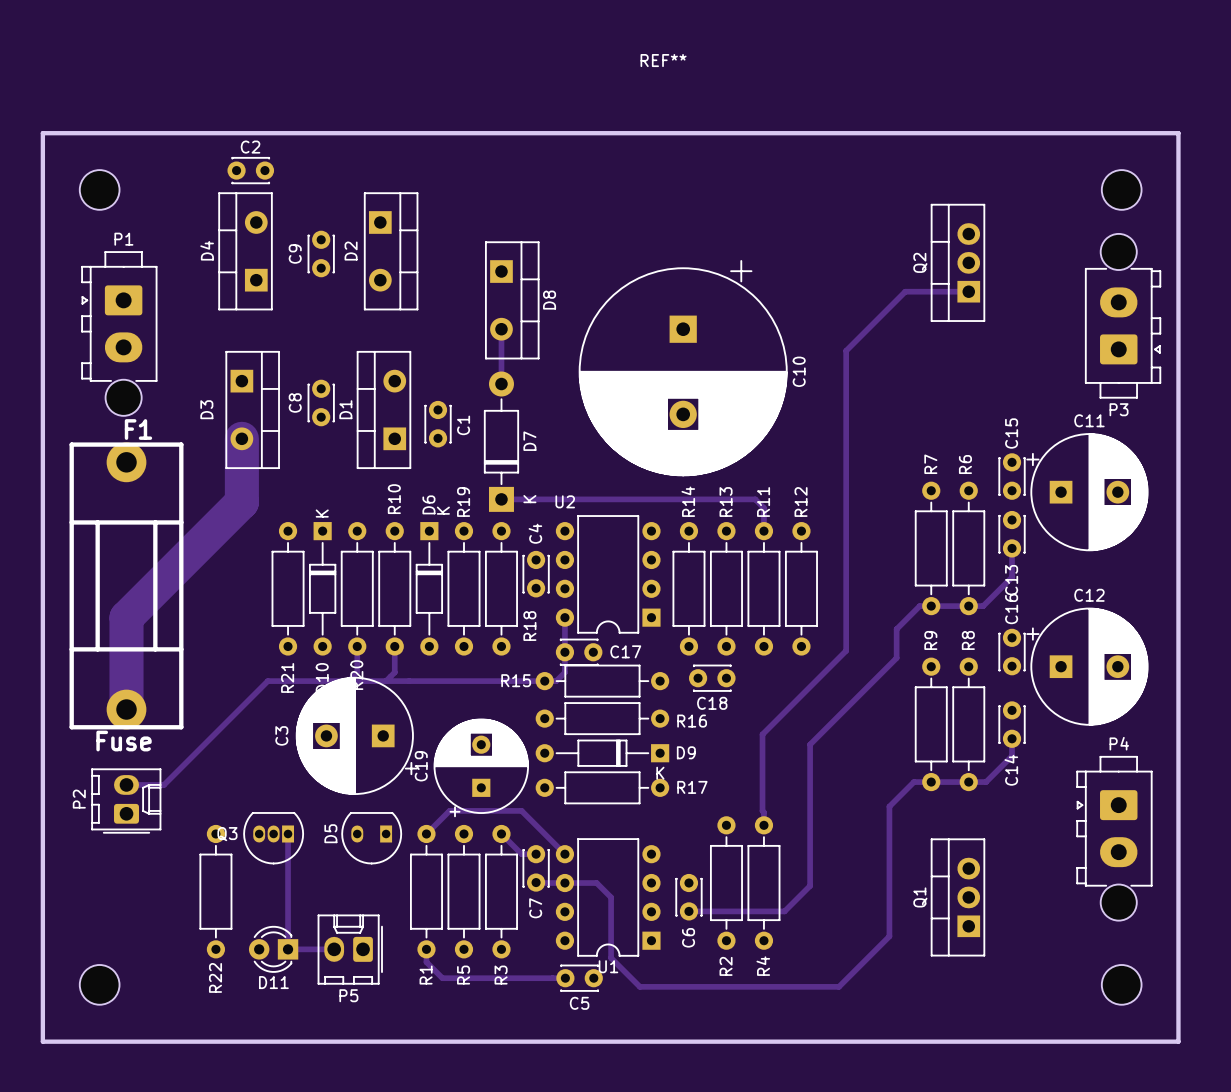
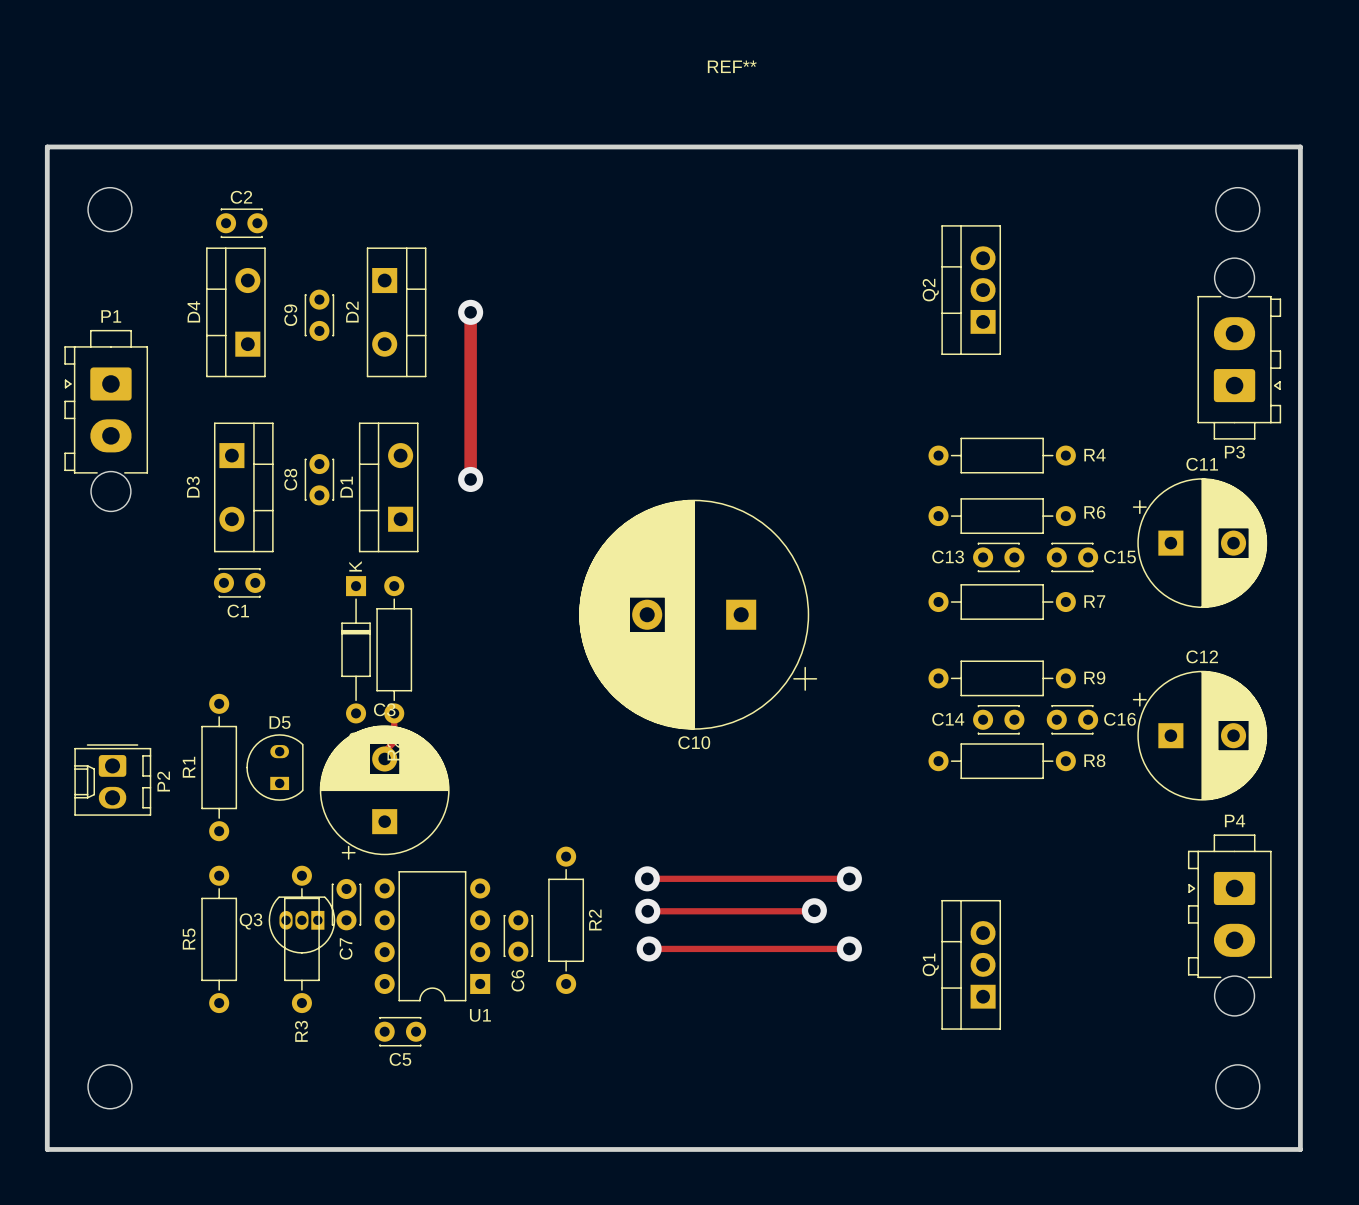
C2 position: (250, 170) -> (241, 223)
D4 position: (245, 251) -> (235, 312)
D2 position: (391, 251) -> (396, 312)
C9 position: (321, 253) -> (319, 315)
Q2 position: (957, 262) -> (971, 290)
track: none -> (470, 312) (470, 479)
via: none -> (470, 312)
track: (968, 291) (905, 291) (846, 350) (846, 650) (762, 734) (763, 825) -> none
D8: (512, 300) -> none
track: (501, 329) (501, 384) -> none
P1 position: (119, 333) -> (106, 420)
C10 rotation: 0° (683, 368) -> 90° clockwise (698, 614)
C10 position: (683, 368) -> (698, 614)
C8 position: (321, 402) -> (319, 479)
D3 position: (252, 409) -> (243, 487)
D1 position: (383, 409) -> (388, 487)
C1 rotation: 0° (438, 424) -> 90° clockwise (239, 582)
C1 position: (438, 424) -> (239, 582)
via: none -> (470, 479)
track: (241, 438) (241, 502) (126, 617) (126, 709) -> none
D7: (501, 441) -> none
C15 rotation: 0° (1012, 476) -> 90° clockwise (1072, 557)
C15 position: (1012, 476) -> (1072, 557)
track: (501, 499) (755, 499) (763, 508) (763, 531) -> none
C13 rotation: 0° (1012, 534) -> 90° clockwise (998, 557)
C13 position: (1012, 534) -> (998, 557)
R7 rotation: 0° (931, 548) -> 90° clockwise (1002, 602)
R6 rotation: 0° (968, 548) -> 90° clockwise (1002, 516)
R6 position: (968, 548) -> (1002, 516)
track: (1012, 548) (1012, 577) (983, 606) (919, 606) (896, 629) (896, 658) (810, 744) (810, 885) (784, 911) (688, 911) -> none
C4: (536, 574) -> none
U2: (608, 574) -> none
F1: Fuse (126, 585) -> none
R21: (288, 588) -> none
R10: (394, 588) -> none
D6: (429, 588) -> none
R19: (463, 588) -> none
R18: (501, 588) -> none
R14: (688, 588) -> none
R13: (726, 588) -> none
R11: (763, 588) -> none
R12: (801, 588) -> none
track: (564, 617) (564, 672) (556, 681) (267, 681) (164, 784) (126, 784) -> none
track: (394, 646) (394, 672) (386, 681) -> none
C17: (579, 652) -> none
C16 rotation: 0° (1012, 652) -> 90° clockwise (1072, 719)
C16 position: (1012, 652) -> (1072, 719)
C18: (712, 678) -> none
R15: (602, 681) -> none
R16: (602, 718) -> none
R9 rotation: 0° (931, 724) -> 90° clockwise (1002, 678)
R9 position: (931, 724) -> (1002, 678)
R8 rotation: 0° (968, 724) -> 90° clockwise (1002, 761)
C14 rotation: 0° (1012, 724) -> 90° clockwise (998, 719)
C14 position: (1012, 724) -> (998, 719)
C3 rotation: 0° (356, 735) -> 90° clockwise (384, 792)
track: (1012, 738) (1012, 756) (986, 782) (913, 782) (889, 806) (889, 936) (838, 986) (639, 986) (611, 958) (611, 897) (596, 883) (536, 882) -> none
D9: (602, 753) -> none
C19: (481, 767) -> none
R17: (602, 787) -> none
track: none -> (647, 878) (849, 878)
via: none -> (647, 878)
via: none -> (849, 878)
P2 rotation: 0° (126, 801) -> 180° (112, 780)
P2 position: (126, 801) -> (112, 780)
via: none -> (647, 911)
track: none -> (814, 910) (647, 911)
via: none -> (814, 910)
track: (288, 833) (288, 949) (334, 949) -> none
track: (426, 833) (449, 810) (521, 810) (564, 854) -> none
track: (501, 833) (521, 854) (536, 854) -> none
D5 rotation: 0° (371, 838) -> 90° clockwise (274, 767)
D5 position: (371, 838) -> (274, 767)
track: none -> (649, 948) (849, 948)
via: none -> (649, 948)
via: none -> (849, 948)
C7 position: (536, 868) -> (346, 904)
R2 position: (726, 883) -> (566, 920)
R4 rotation: 0° (763, 883) -> 90° clockwise (1002, 455)
R4 position: (763, 883) -> (1002, 455)
R22: (215, 891) -> none
R1 position: (426, 891) -> (219, 767)
R5 position: (463, 891) -> (219, 939)
R3 position: (501, 891) -> (301, 939)
U1 position: (608, 897) -> (432, 936)
C6 position: (688, 897) -> (518, 935)
Q1 position: (957, 897) -> (971, 964)
D11: (273, 949) -> none
P5: (350, 949) -> none
track: (426, 949) (426, 962) (442, 978) (565, 978) -> none
U1 name position: U1 (608, 966) -> U1 (480, 1015)
R2 name position: R2 (726, 966) -> R2 (595, 920)
R4 name position: R4 (763, 966) -> R4 (1094, 455)
R1 name position: R1 (426, 975) -> R1 (189, 767)
R5 name position: R5 (463, 975) -> R5 (189, 939)
C5 position: (579, 978) -> (400, 1031)

